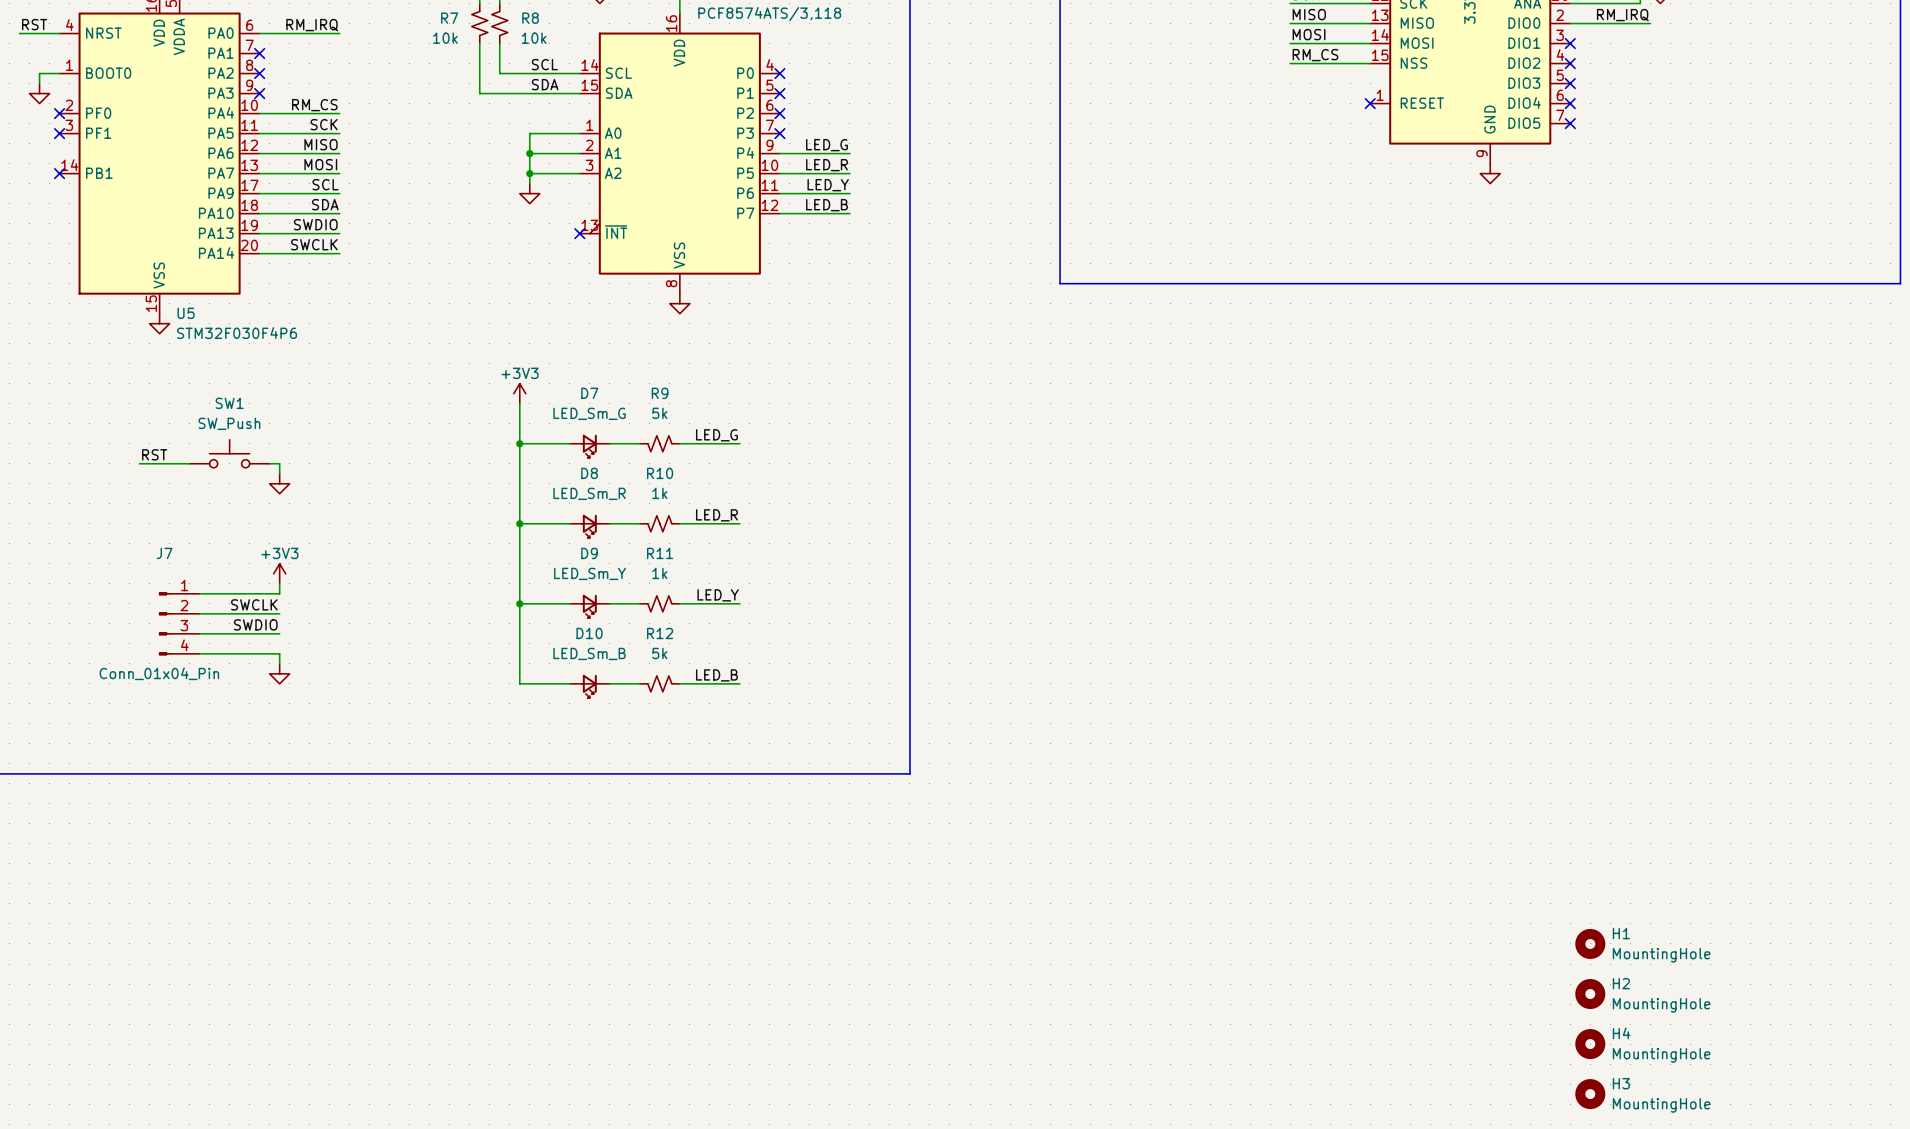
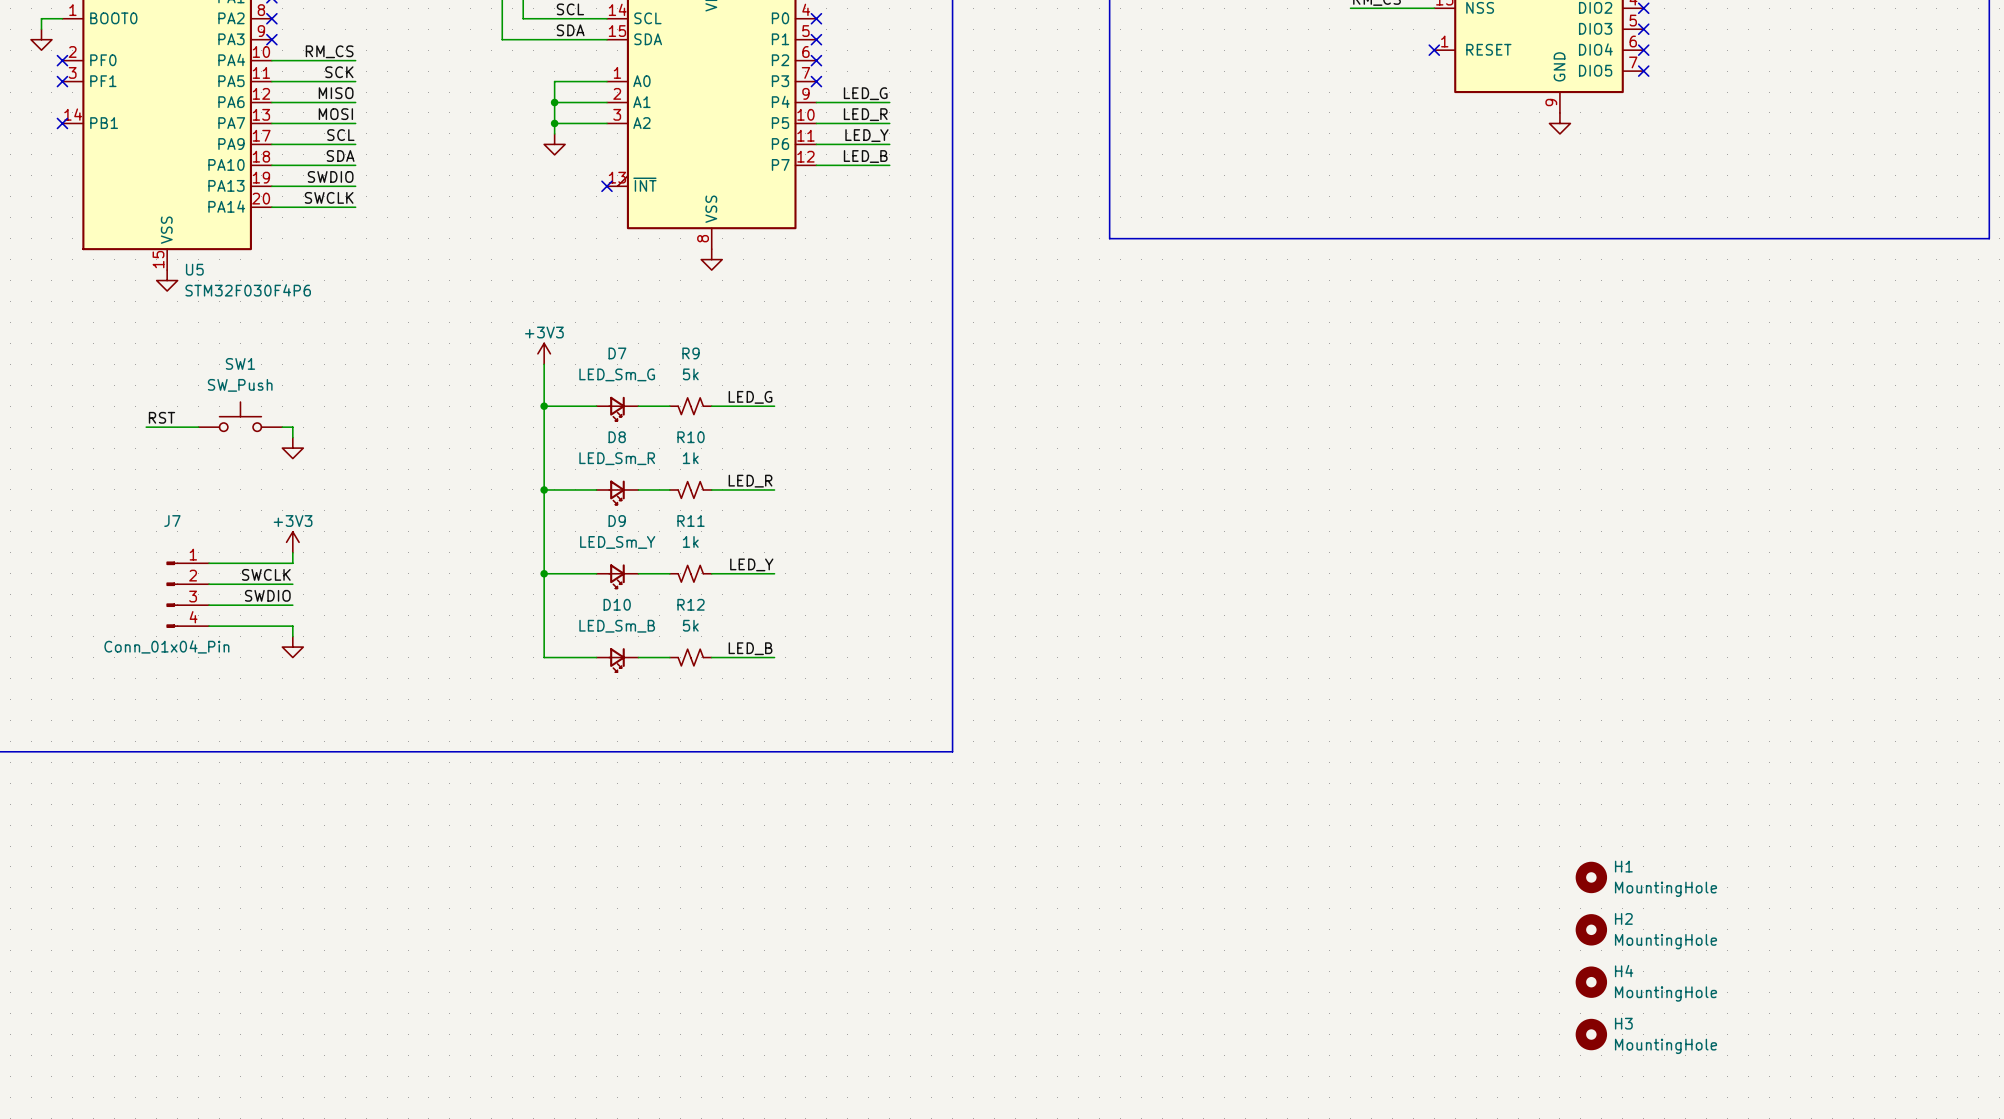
H1 position: (1590, 943) -> (1591, 877)
H2 position: (1590, 994) -> (1591, 929)
H4 position: (1590, 1044) -> (1591, 982)
H3 position: (1590, 1094) -> (1591, 1034)

